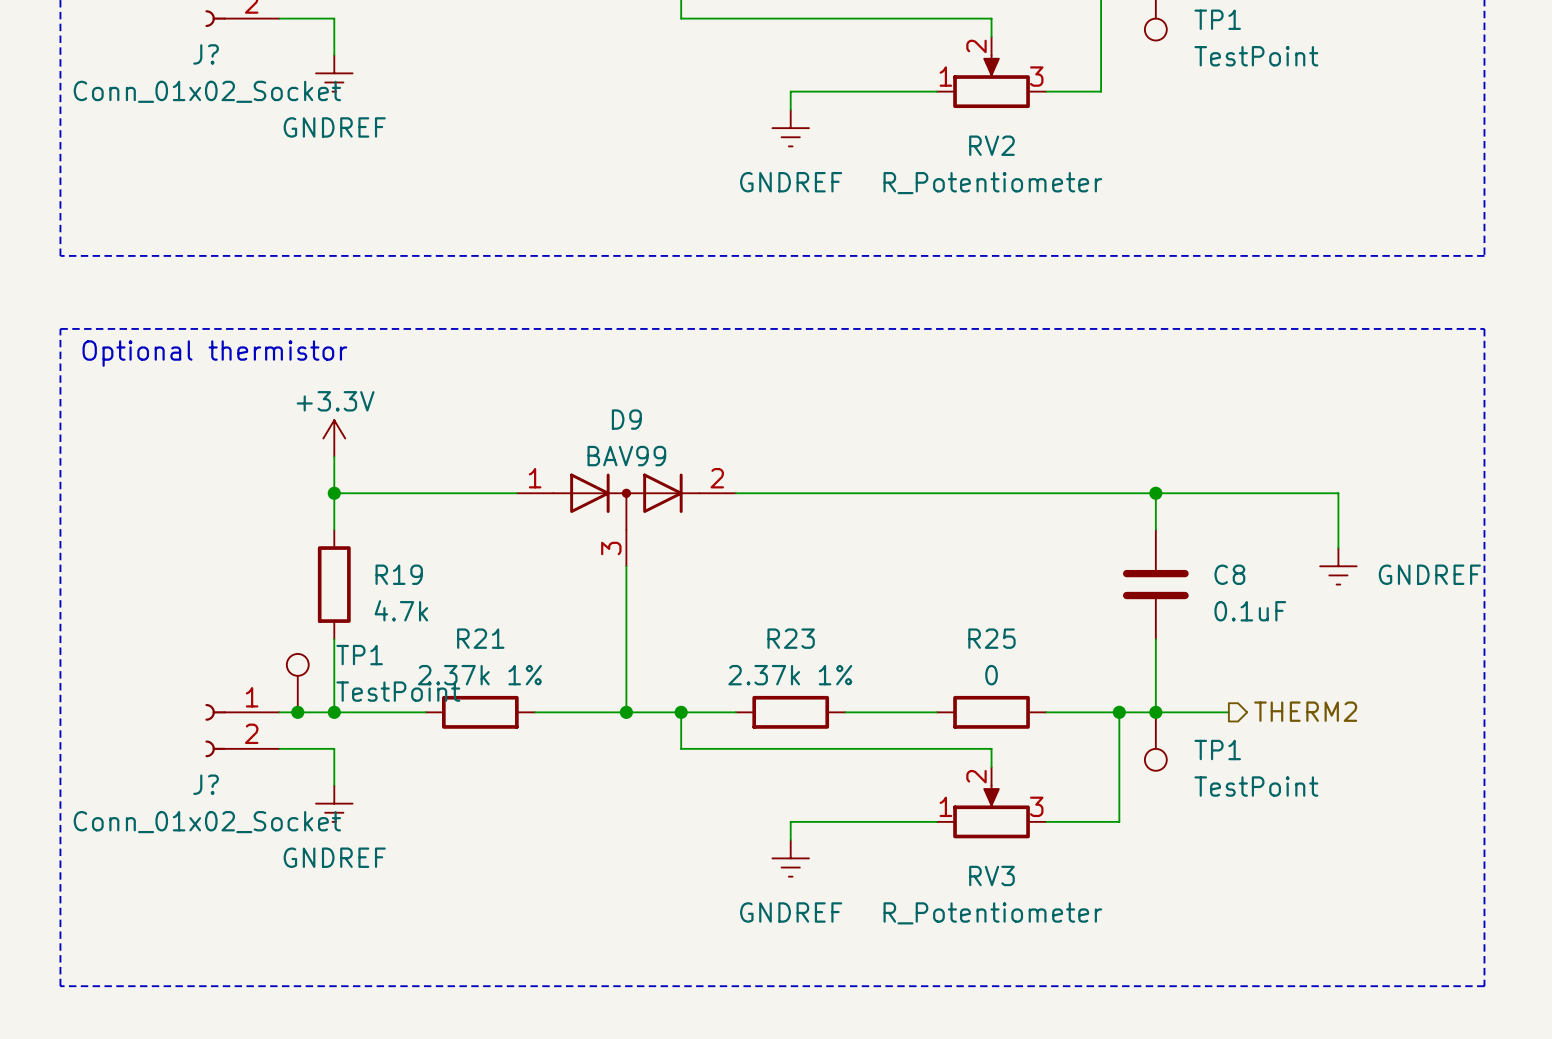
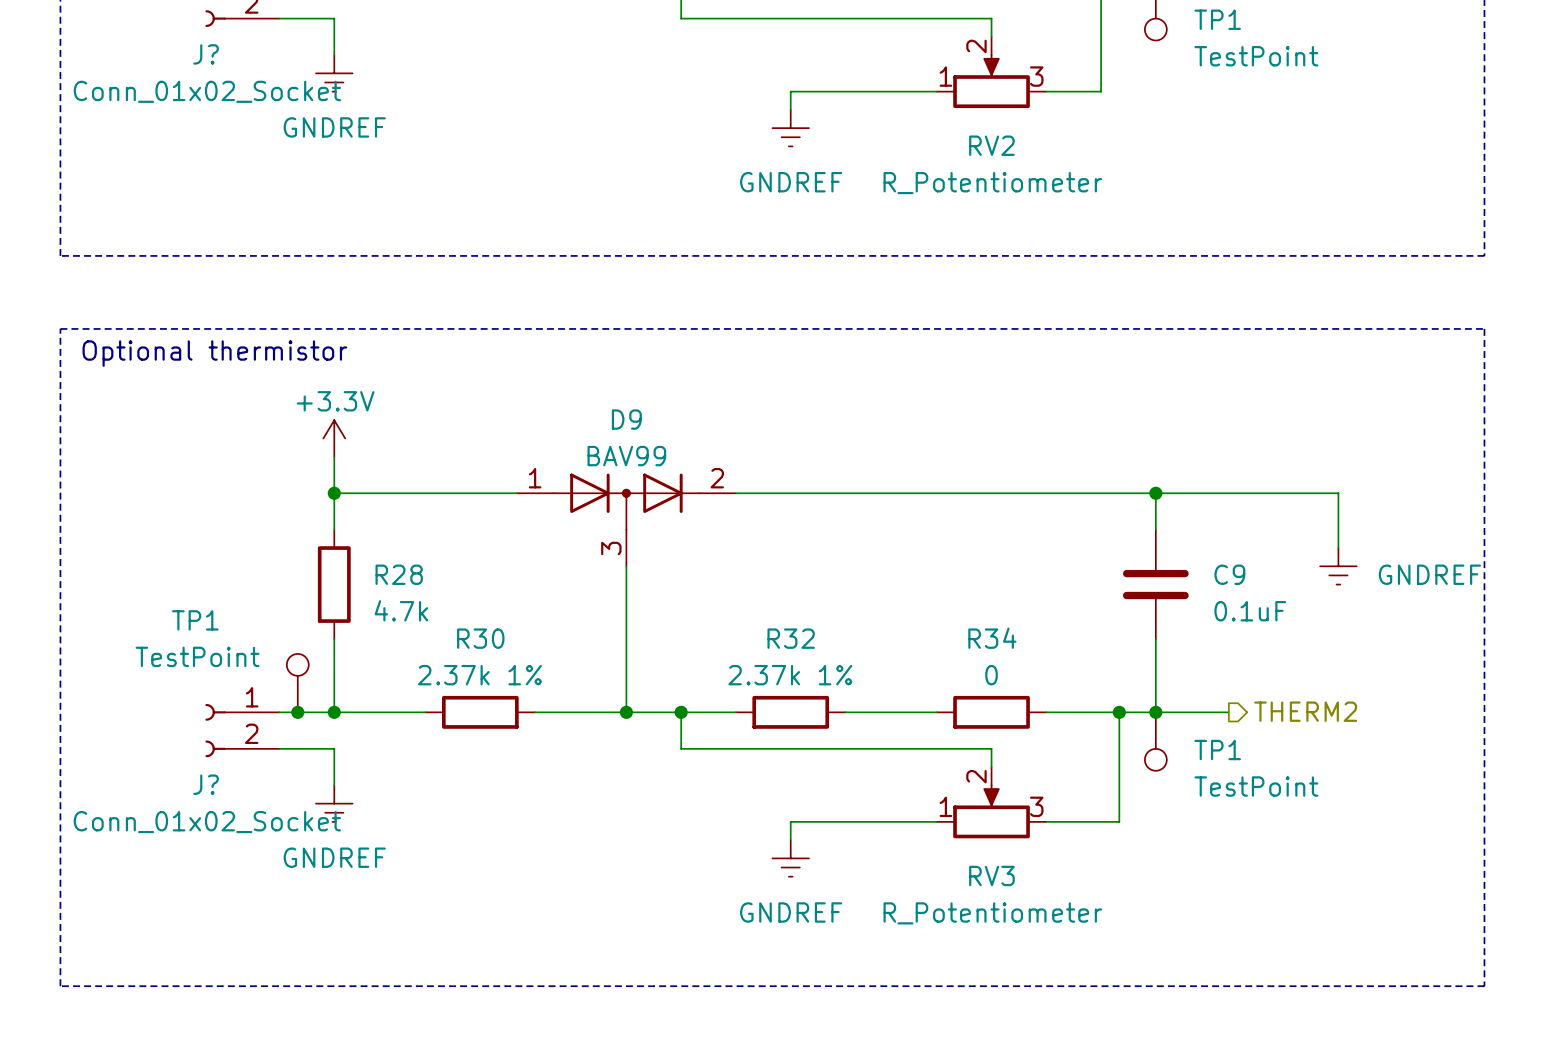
R19 name: R19 (399, 574) -> R28 (399, 574)
C8 name: C8 (1229, 574) -> C9 (1229, 574)
R21 name: R21 (480, 638) -> R30 (480, 638)
R23 name: R23 (791, 638) -> R32 (791, 638)
R25 name: R25 (991, 638) -> R34 (992, 638)
TP1 name position: TP1 (359, 655) -> TP1 (195, 620)
TP1 value position: TestPoint (398, 691) -> TestPoint (197, 656)

